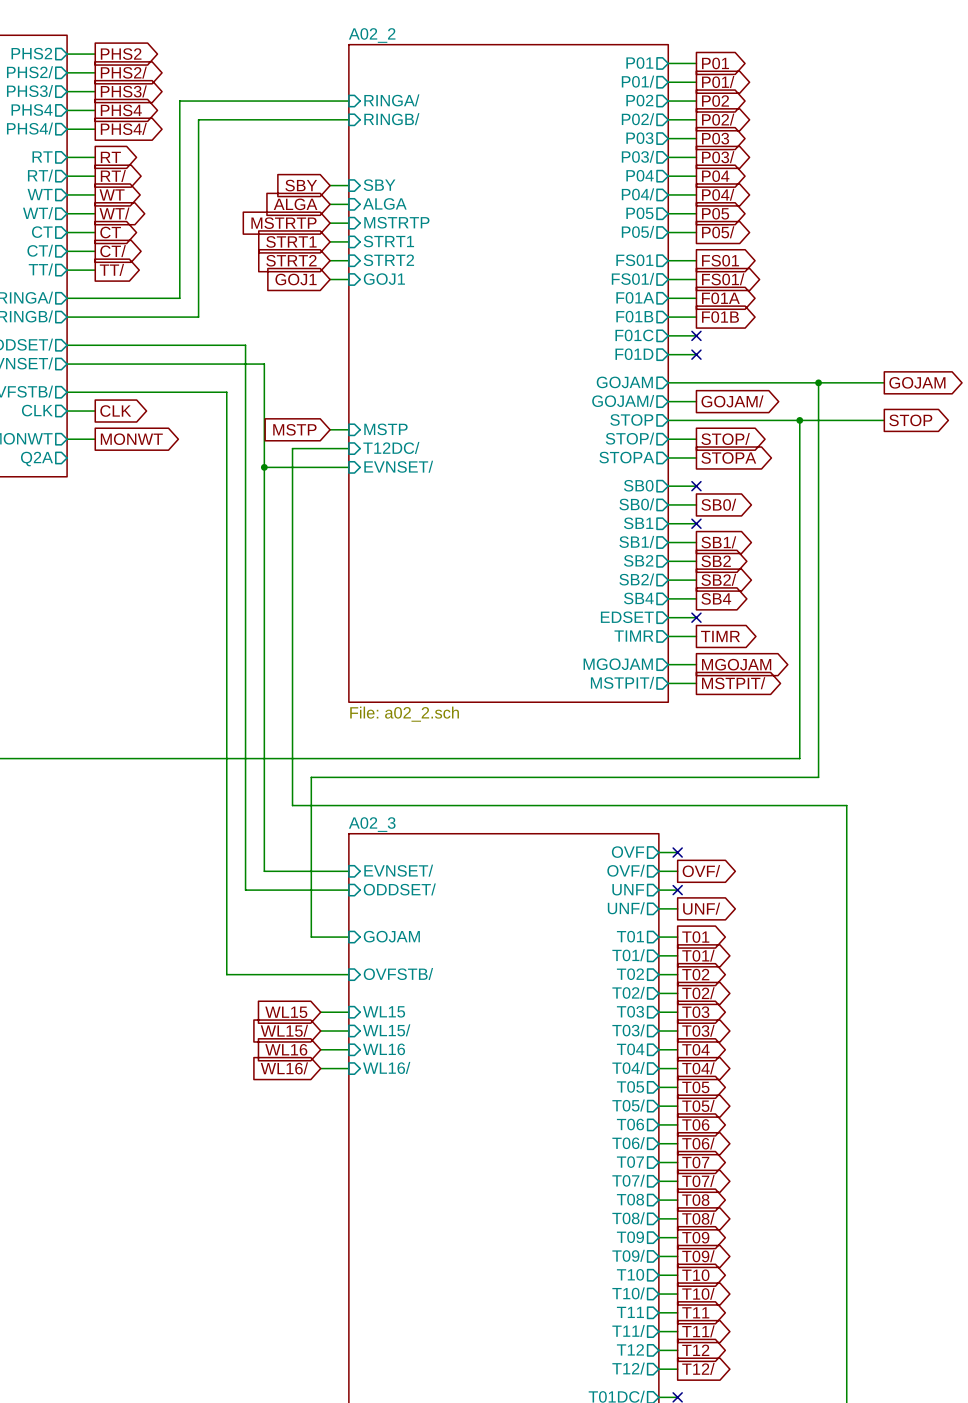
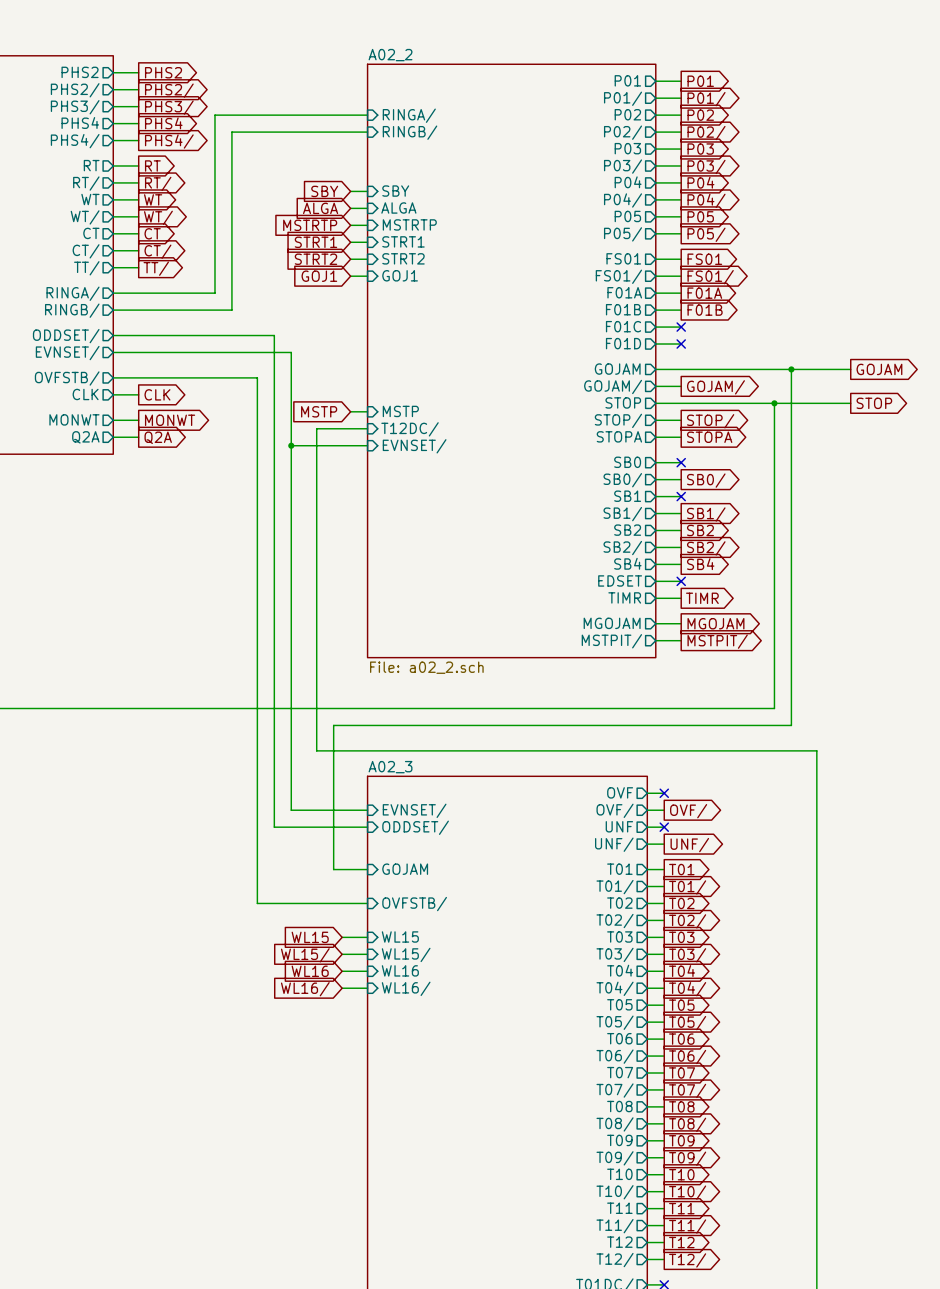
wire: none -> (113, 437) (138, 437)
global label: none -> Q2A (158, 437)

